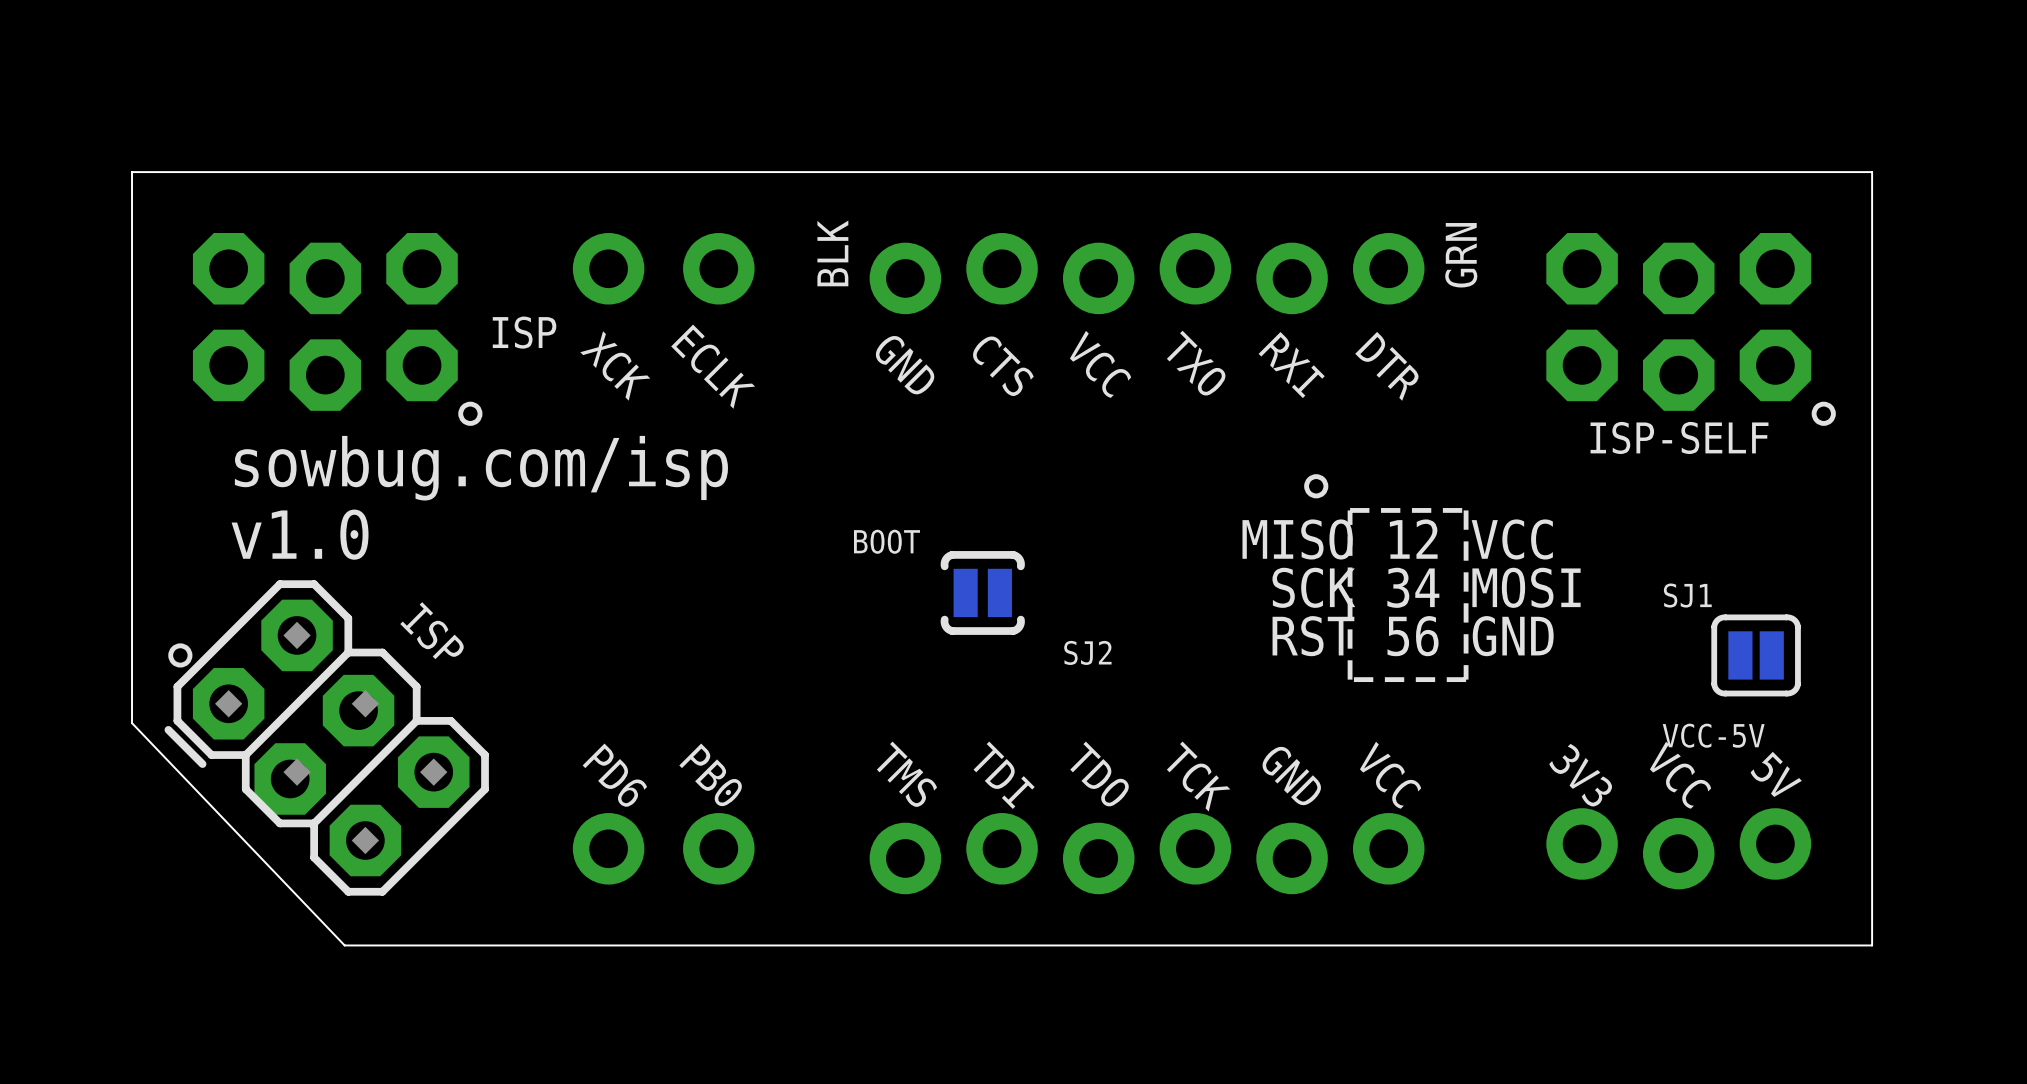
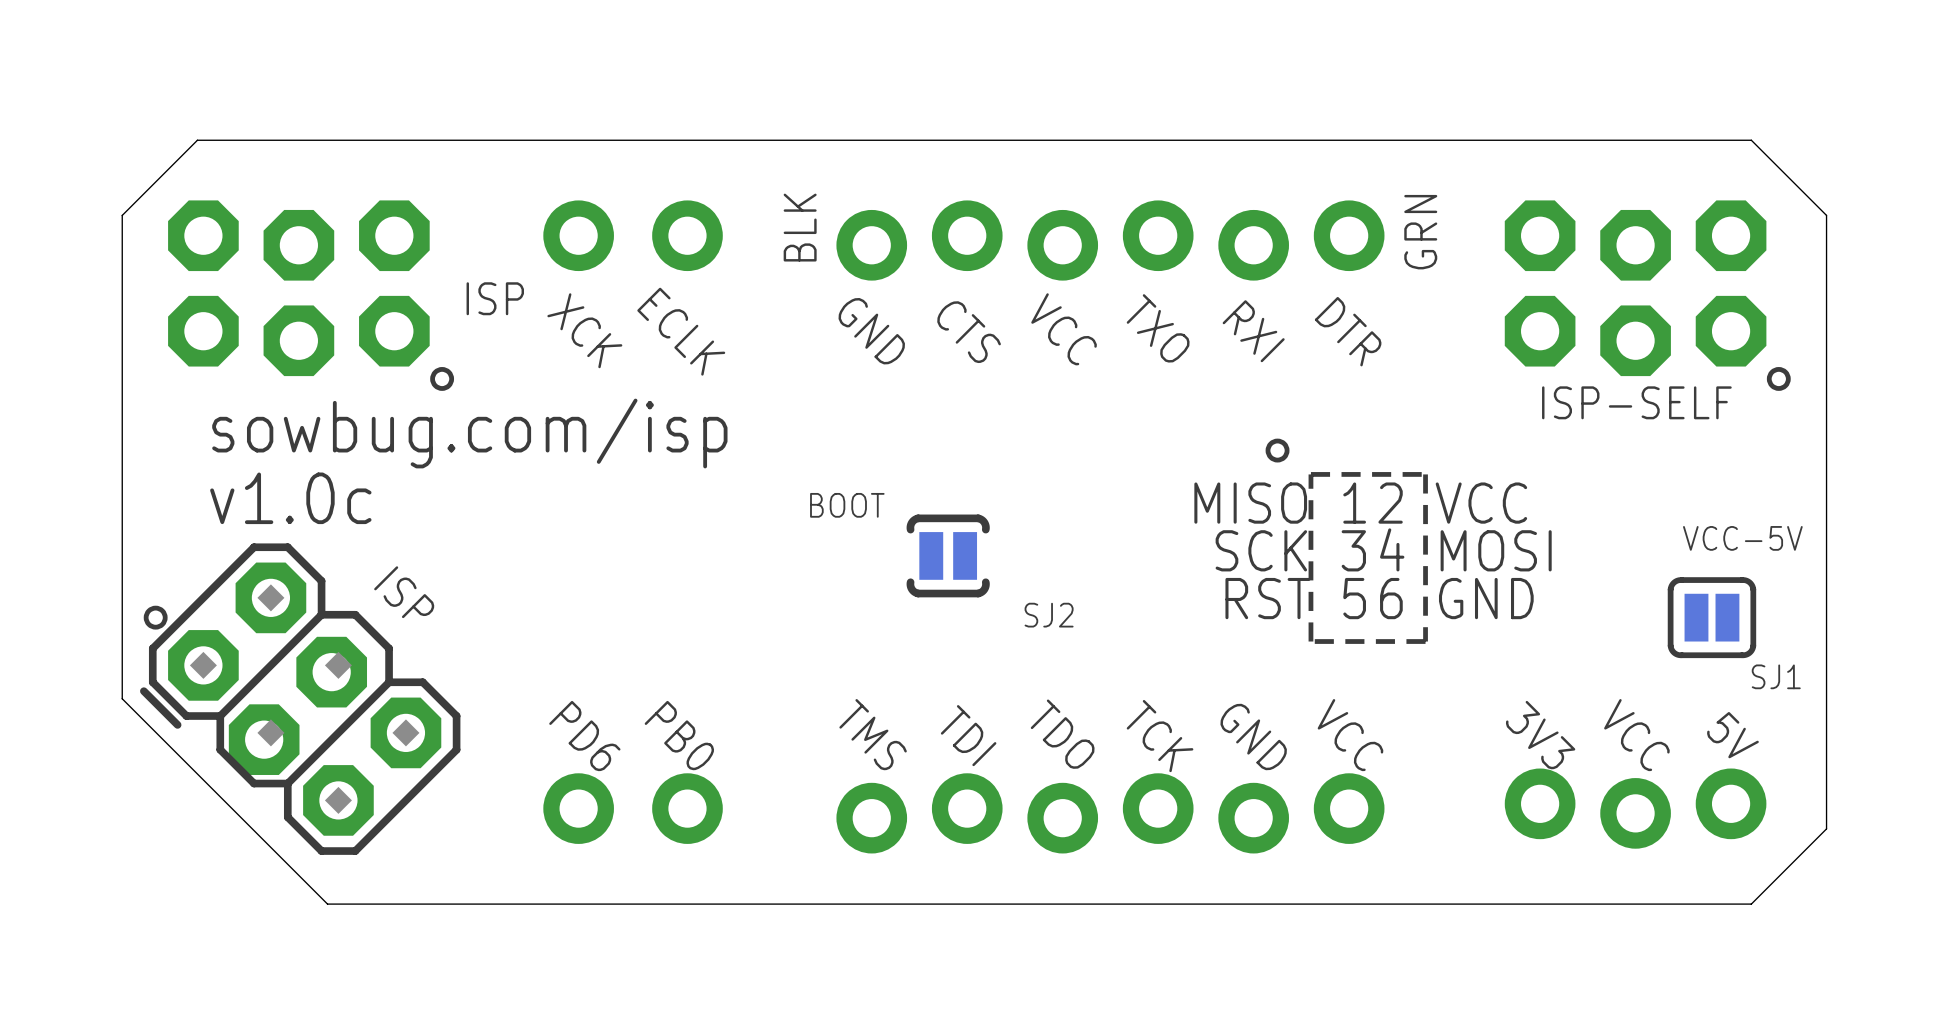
board edge: (222, 172) (132, 172) (132, 723) (344, 945) (354, 945) -> (197, 140) (122, 215) (122, 698) (327, 904)
board edge: (1795, 172) (1872, 172) (1872, 248) -> (1751, 140) (1826, 215)
text: v1.0 (300, 534) -> v1.0c (290, 498)
SJ1 rotation: 0° (1756, 655) -> 180° (1711, 617)
board edge: (1872, 869) (1872, 945) (1795, 945) -> (1826, 828) (1751, 904)

